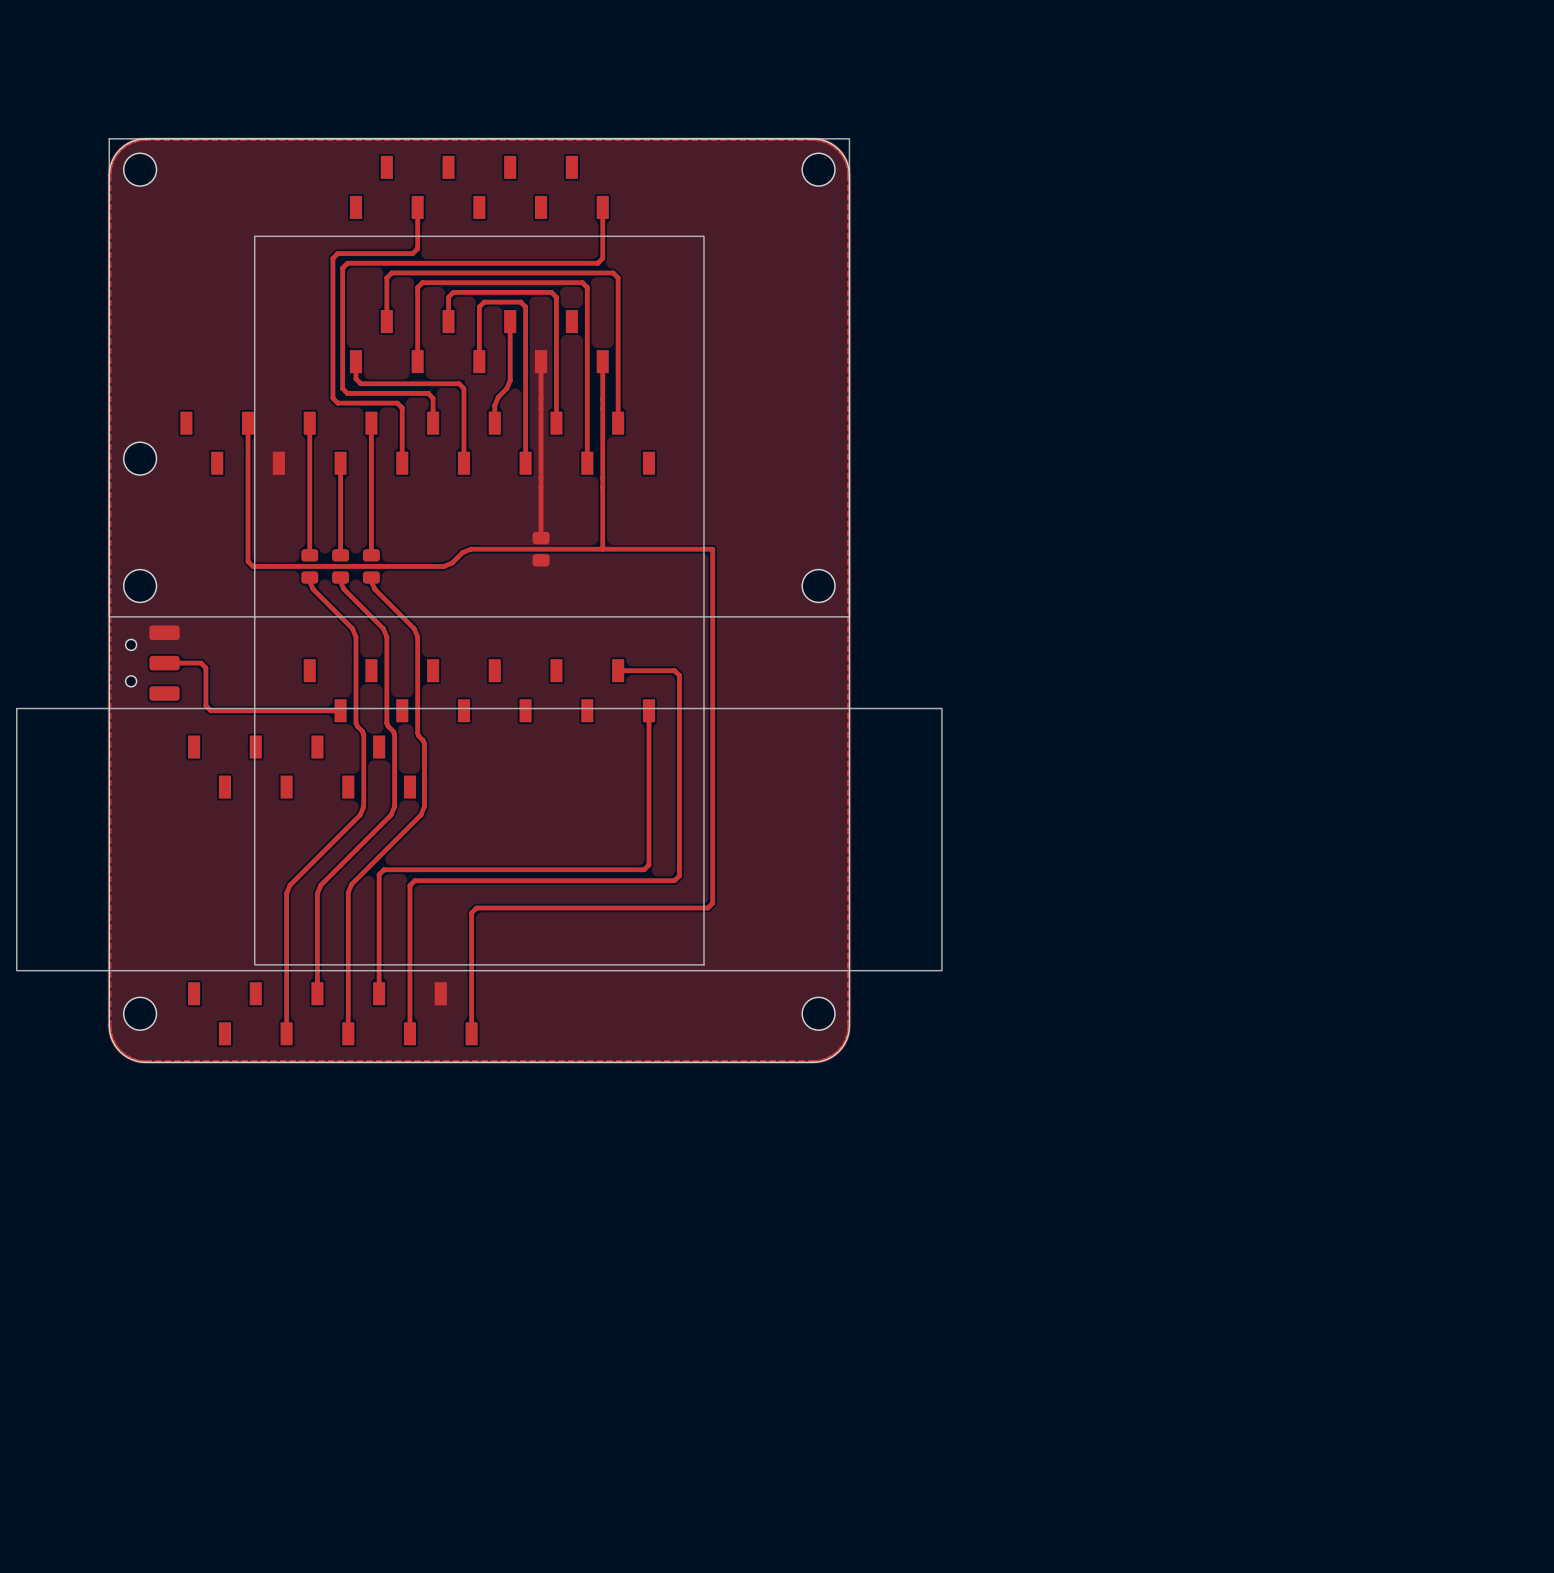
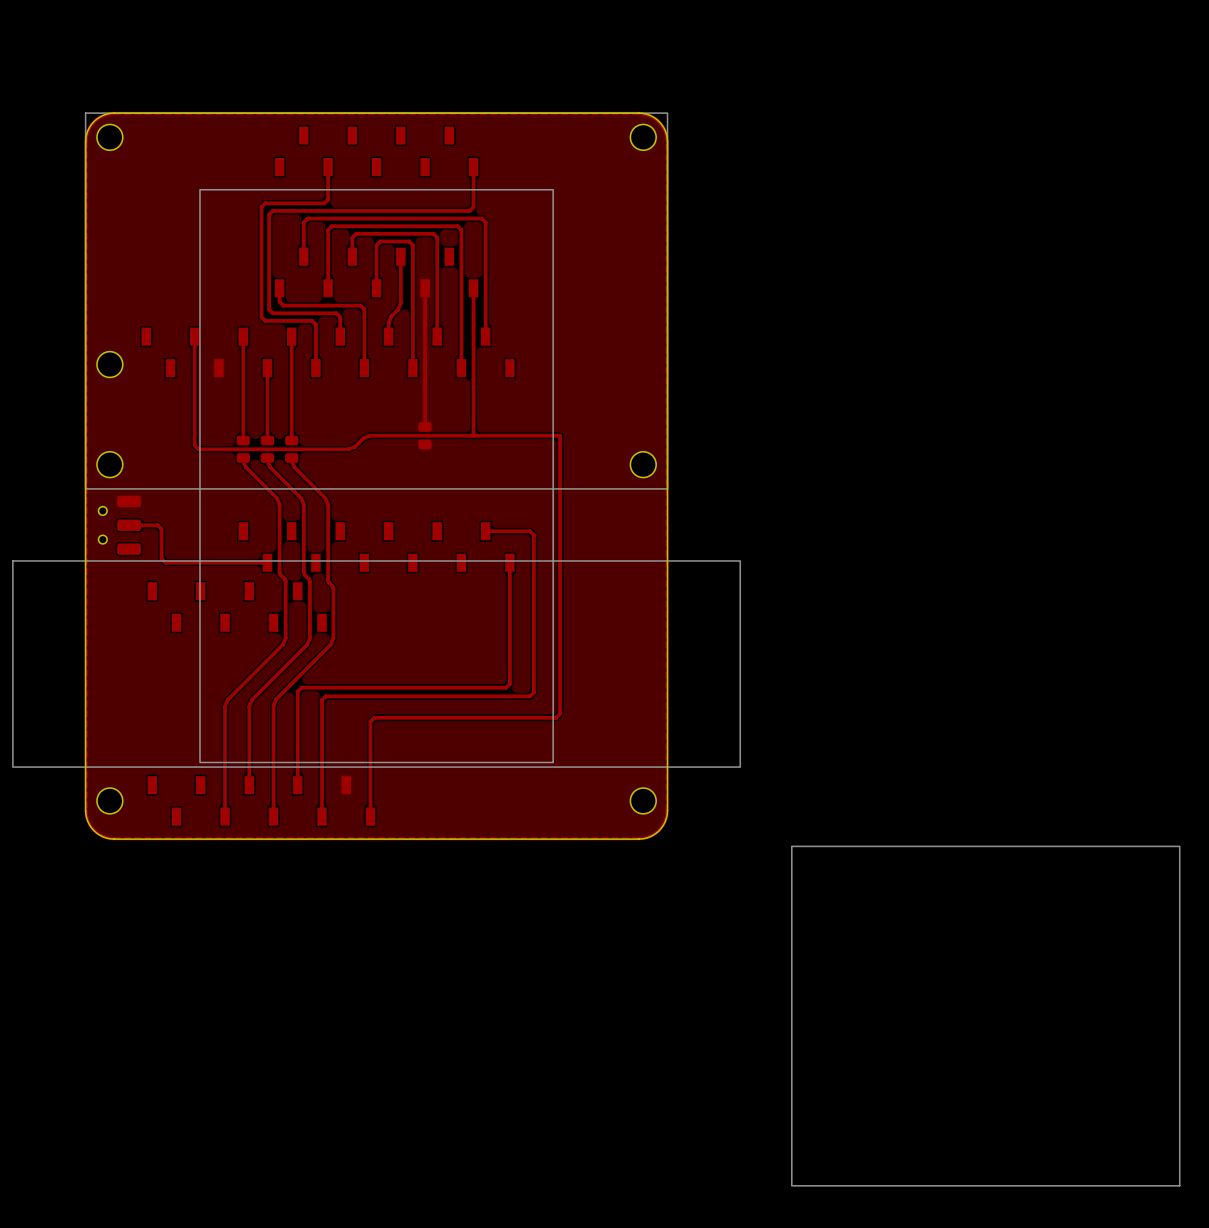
drawing: none -> [791, 845, 1181, 1187]

